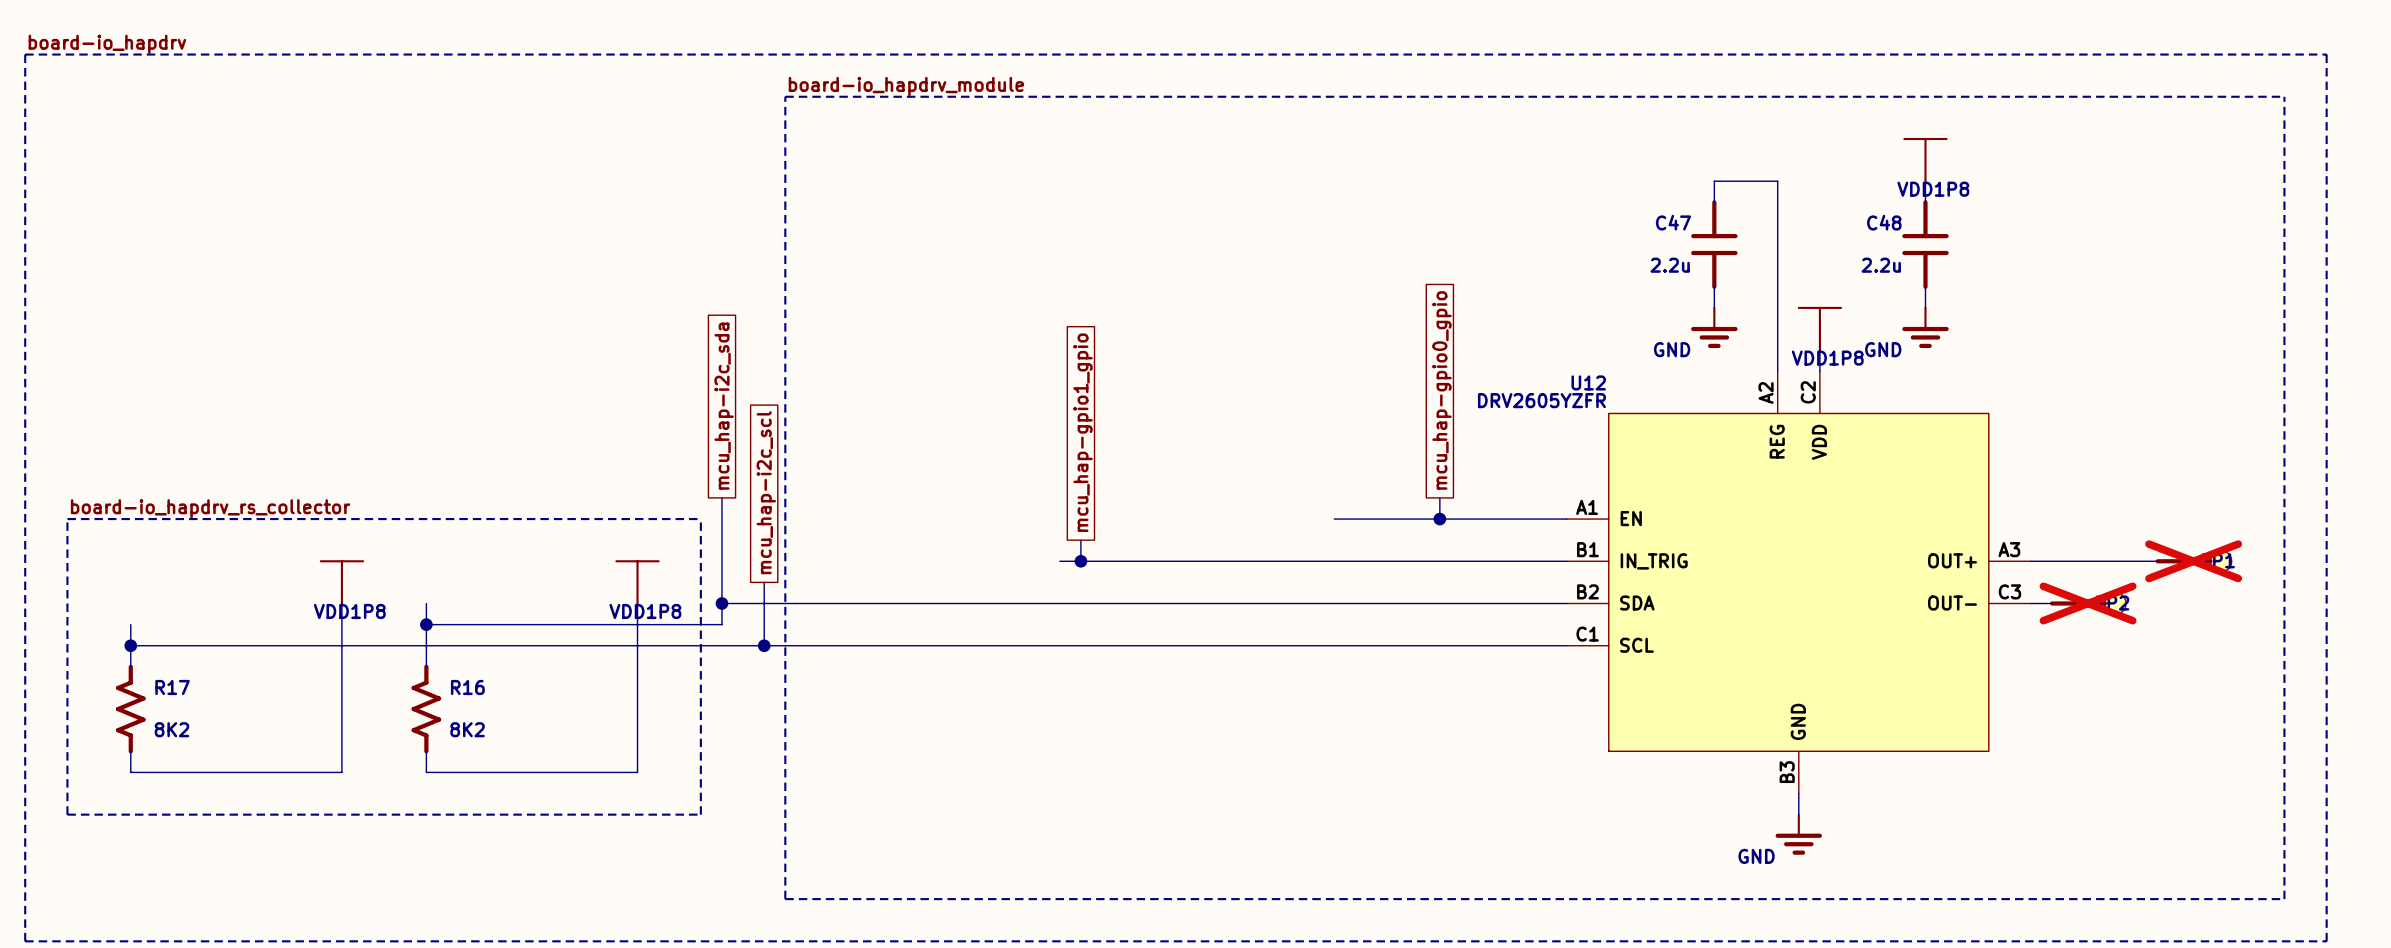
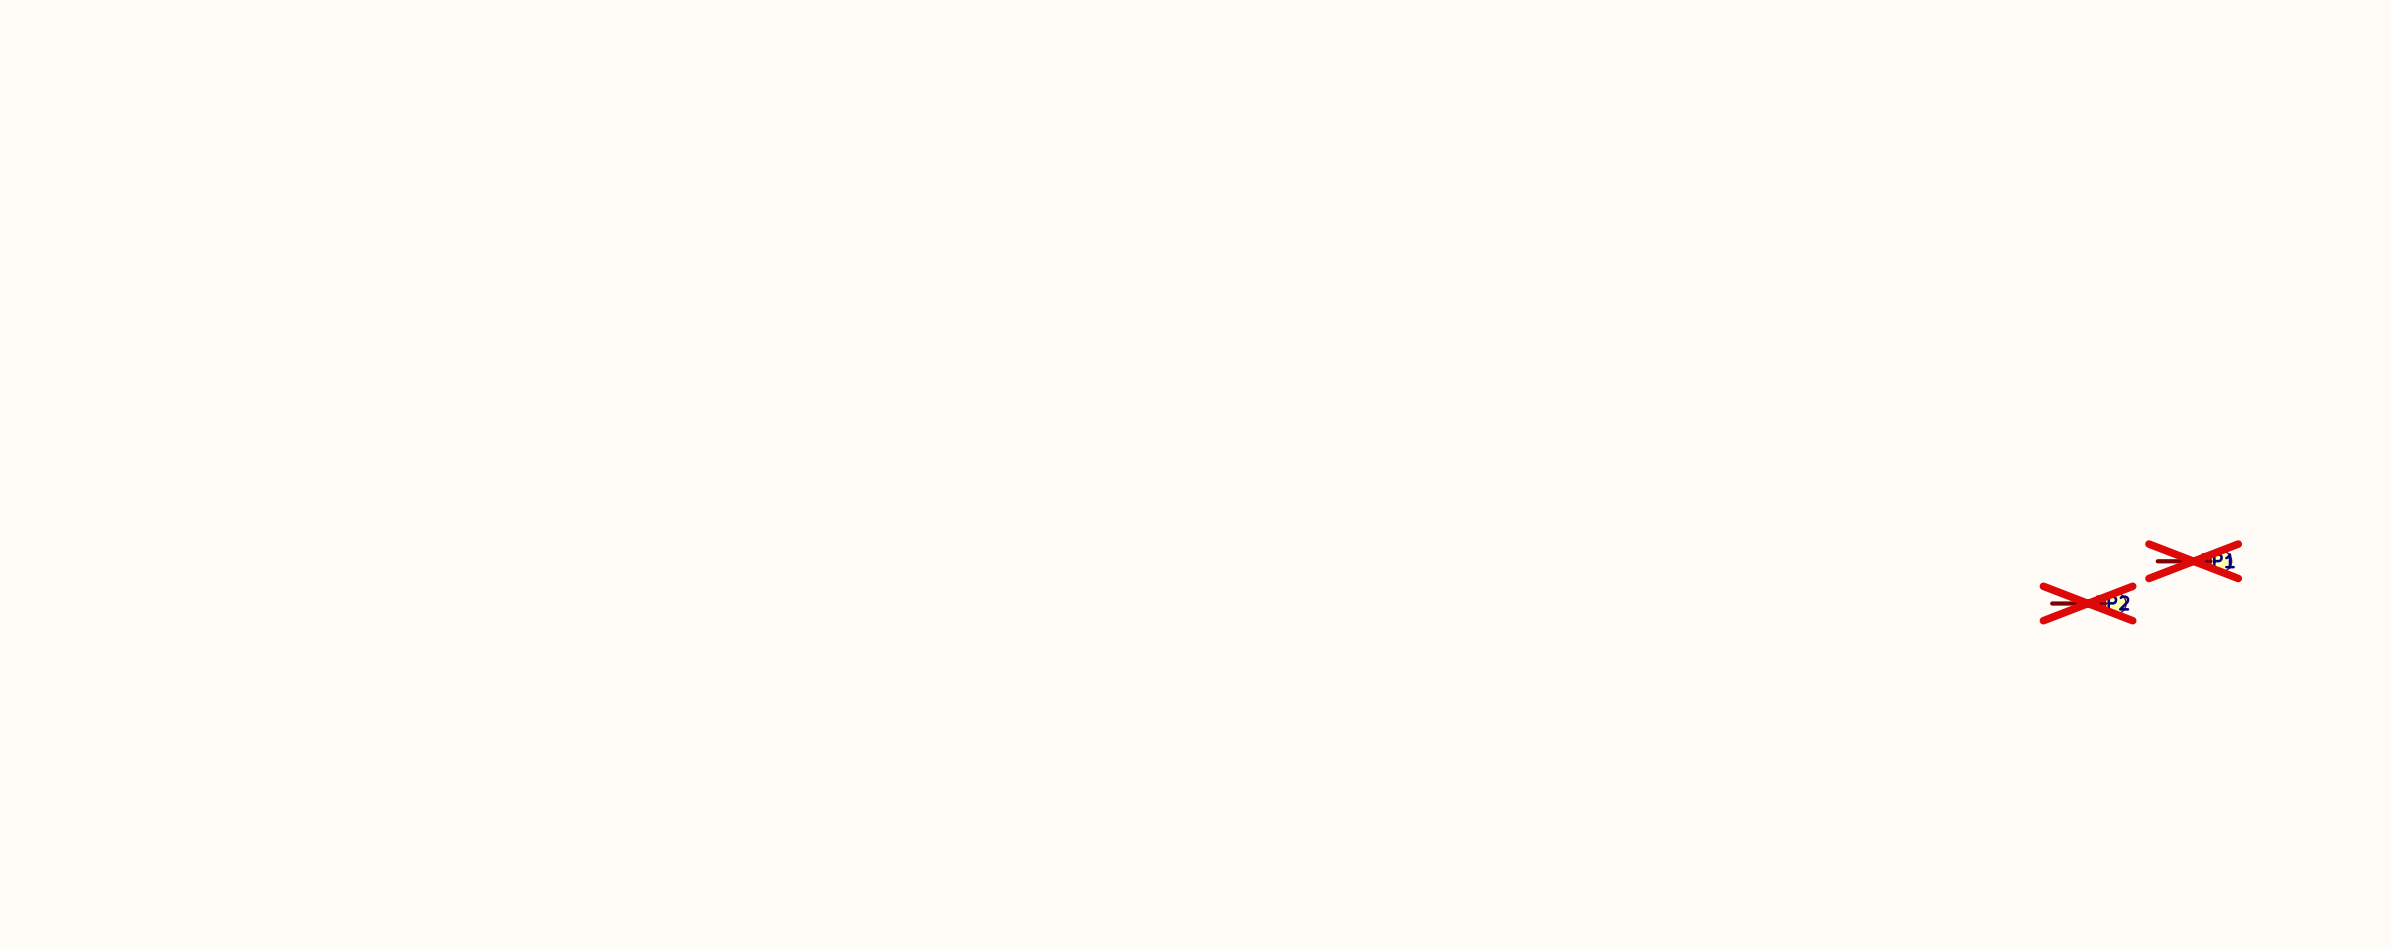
label: board-io_hapdrv (107, 44) -> none
line: (25, 54) (2326, 54) (2326, 941) (25, 941) (25, 54) -> none
label: board-io_hapdrv_module (906, 86) -> none
line: (785, 96) (2284, 96) (2284, 899) (785, 899) (785, 96) -> none
power symbol: VDD1P8 (1925, 160) -> none
wire: (1925, 181) (1925, 202) -> none
wire: (1714, 202) (1714, 181) (1777, 181) (1777, 371) -> none
C47: 2.2u (1714, 244) -> none
C48: 2.2u (1925, 244) -> none
wire: (1714, 286) (1714, 307) -> none
wire: (1925, 286) (1925, 307) -> none
power symbol: GND (1714, 327) -> none
power symbol: GND (1925, 327) -> none
power symbol: VDD1P8 (1819, 329) -> none
wire: (1819, 350) (1819, 371) -> none
global label: mcu_hap-gpio0_gpio (1441, 390) -> none
global label: mcu_hap-i2c_sda (724, 406) -> none
global label: mcu_hap-gpio1_gpio (1083, 432) -> none
global label: mcu_hap-i2c_scl (766, 492) -> none
wire: (721, 497) (721, 624) (426, 624) -> none
wire: (1439, 497) (1439, 519) -> none
label: board-io_hapdrv_rs_collector (210, 508) -> none
line: (67, 519) (700, 519) (700, 814) (67, 814) (67, 519) -> none
wire: (1334, 519) (1566, 519) -> none
junction: (1439, 519) -> none
wire: (1080, 540) (1080, 561) -> none
wire: (1059, 561) (1566, 561) -> none
junction: (1080, 561) -> none
wire: (2031, 561) (2157, 561) -> none
power symbol: VDD1P8 (341, 582) -> none
power symbol: VDD1P8 (637, 582) -> none
wire: (764, 582) (764, 645) -> none
U12: DRV2605YZFR (1798, 582) -> none
wire: (341, 603) (341, 772) (130, 772) (130, 751) -> none
wire: (426, 603) (426, 666) -> none
wire: (637, 603) (637, 772) (426, 772) (426, 751) -> none
wire: (721, 603) (1566, 603) -> none
junction: (721, 603) -> none
wire: (2031, 603) (2052, 603) -> none
wire: (130, 624) (130, 666) -> none
junction: (426, 624) -> none
wire: (130, 645) (1566, 645) -> none
junction: (130, 645) -> none
junction: (764, 645) -> none
R17: 8K2 (130, 709) -> none
R16: 8K2 (426, 709) -> none
wire: (1798, 793) (1798, 814) -> none
power symbol: GND (1798, 834) -> none

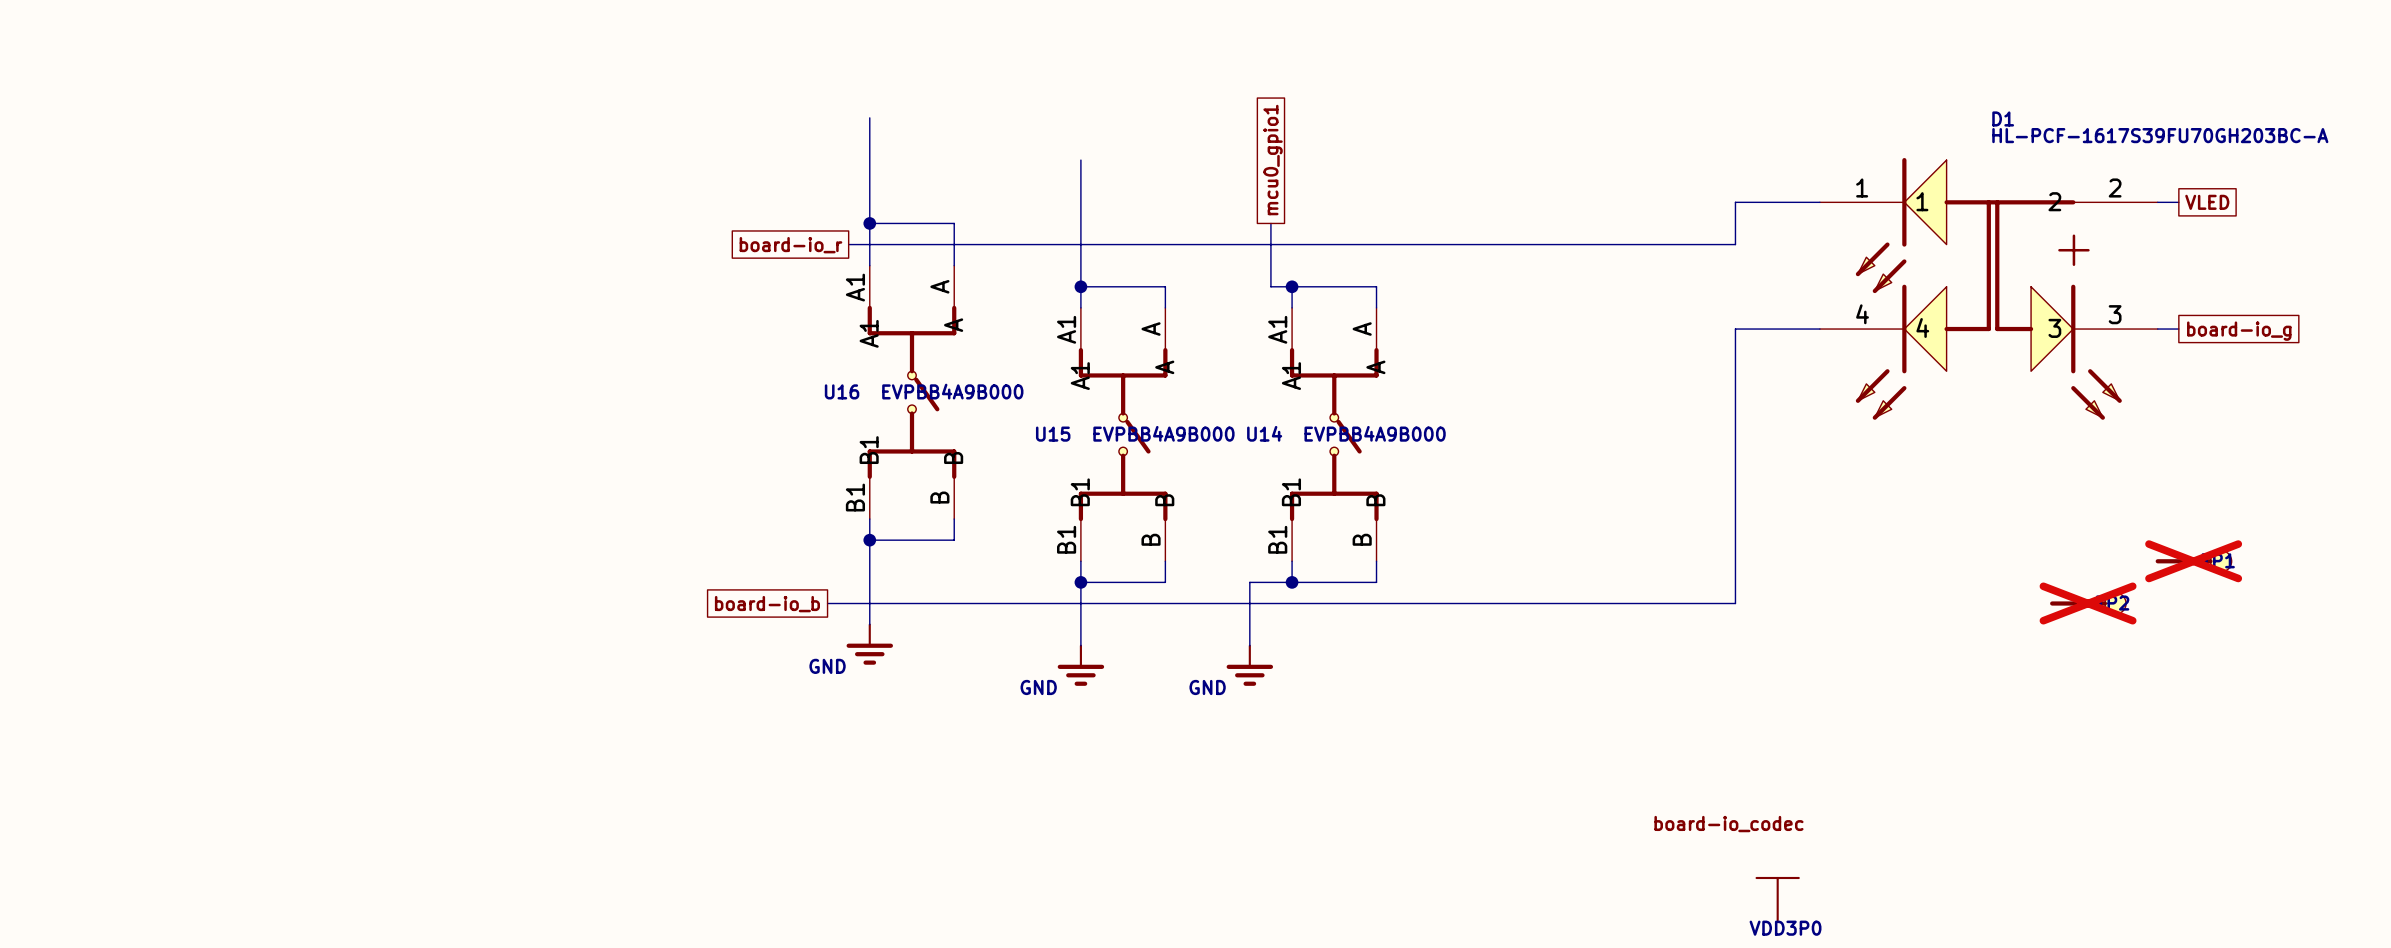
wire: none -> (869, 117) (869, 265)
wire: none -> (1080, 160) (1080, 307)
global label: none -> mcu0_gpio1 (1273, 160)
wire: none -> (1819, 202) (1735, 202) (1735, 244) (848, 244)
wire: none -> (2157, 202) (2178, 202)
global label: none -> VLED (2207, 202)
wire: none -> (869, 223) (954, 223) (954, 265)
junction: none -> (869, 223)
wire: none -> (1270, 223) (1270, 286) (1376, 286) (1376, 307)
global label: none -> board-io_r (790, 245)
wire: none -> (1080, 286) (1165, 286) (1165, 307)
junction: none -> (1080, 286)
wire: none -> (1292, 286) (1292, 307)
junction: none -> (1292, 286)
D1: none -> HL-PCF-1617S39FU70GH203BC-A (1988, 288)
wire: none -> (1819, 329) (1735, 329) (1735, 603) (827, 603)
wire: none -> (2157, 329) (2178, 329)
global label: none -> board-io_g (2239, 331)
U16: none -> EVPBB4A9B000 (912, 392)
U15: none -> EVPBB4A9B000 (1123, 434)
U14: none -> EVPBB4A9B000 (1334, 434)
wire: none -> (869, 519) (869, 624)
wire: none -> (954, 519) (954, 540) (869, 540)
junction: none -> (869, 540)
wire: none -> (1080, 561) (1080, 645)
wire: none -> (1165, 561) (1165, 582) (1080, 582)
wire: none -> (1292, 561) (1292, 582)
wire: none -> (1376, 561) (1376, 582) (1249, 582) (1249, 645)
junction: none -> (1080, 582)
junction: none -> (1292, 582)
global label: none -> board-io_b (767, 604)
power symbol: none -> GND (869, 644)
power symbol: none -> GND (1080, 665)
power symbol: none -> GND (1249, 665)
label: none -> board-io_codec (1728, 824)
power symbol: none -> VDD3P0 (1777, 899)

